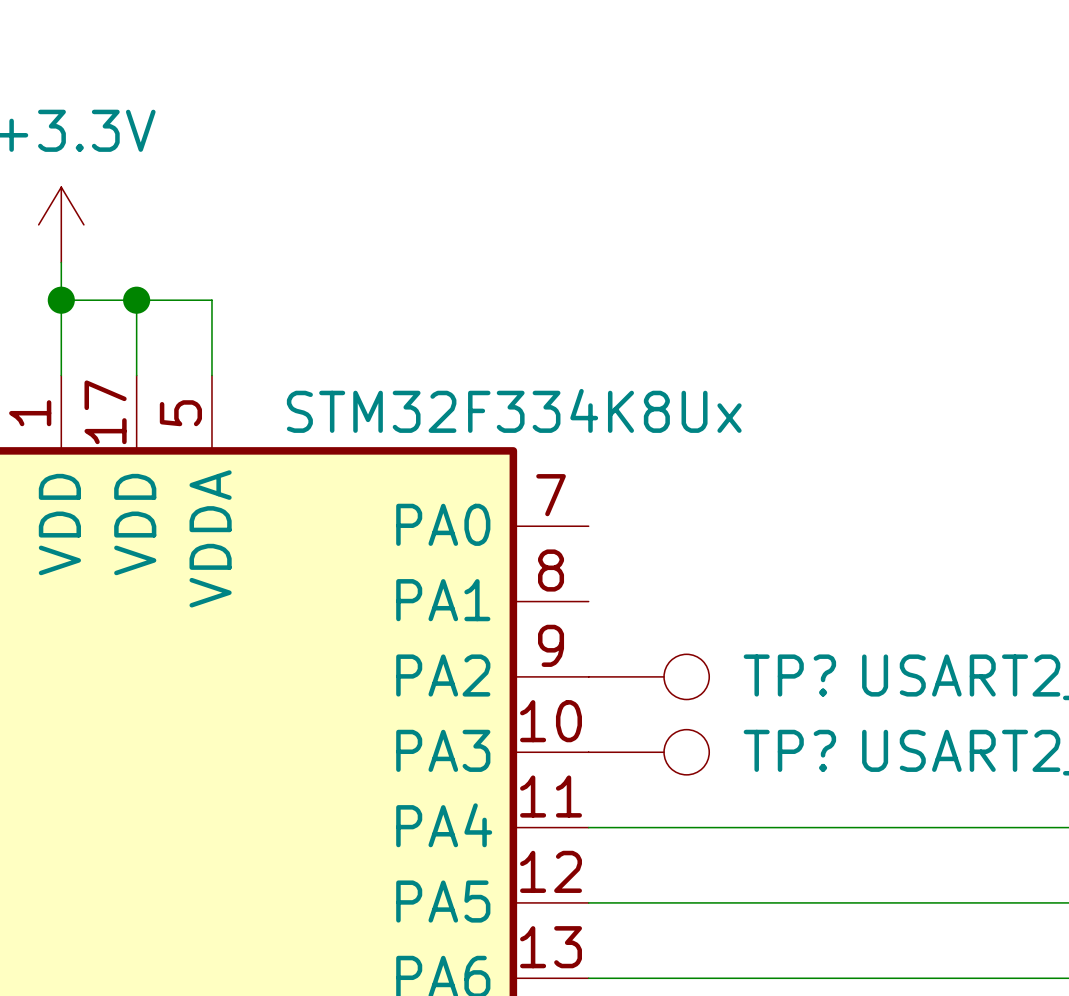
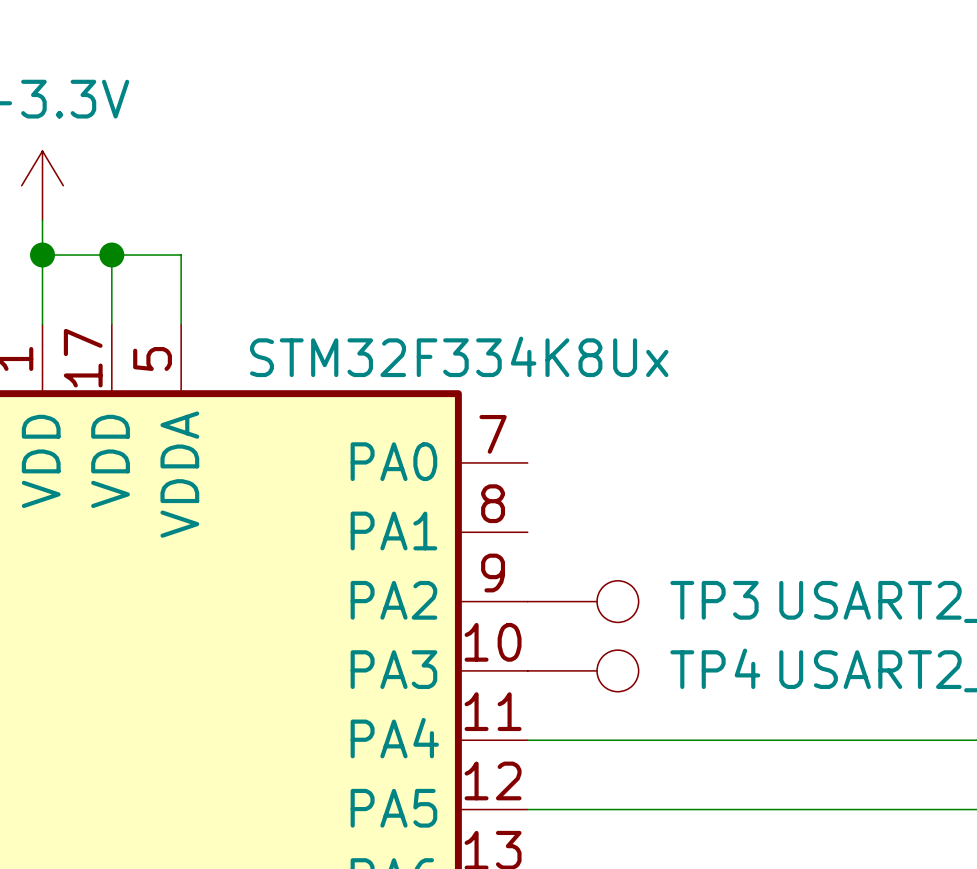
TP? name: TP? (789, 675) -> TP3 (714, 600)
TP? name: TP? (789, 750) -> TP4 (715, 668)

